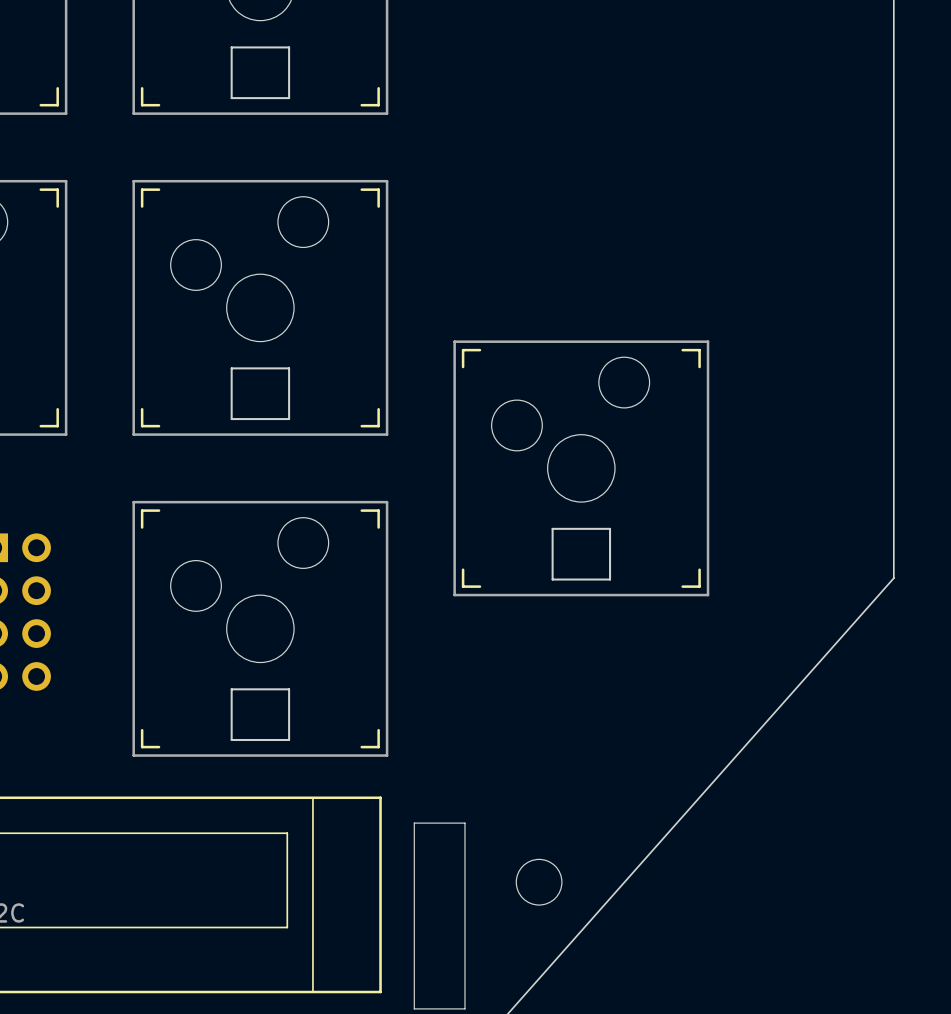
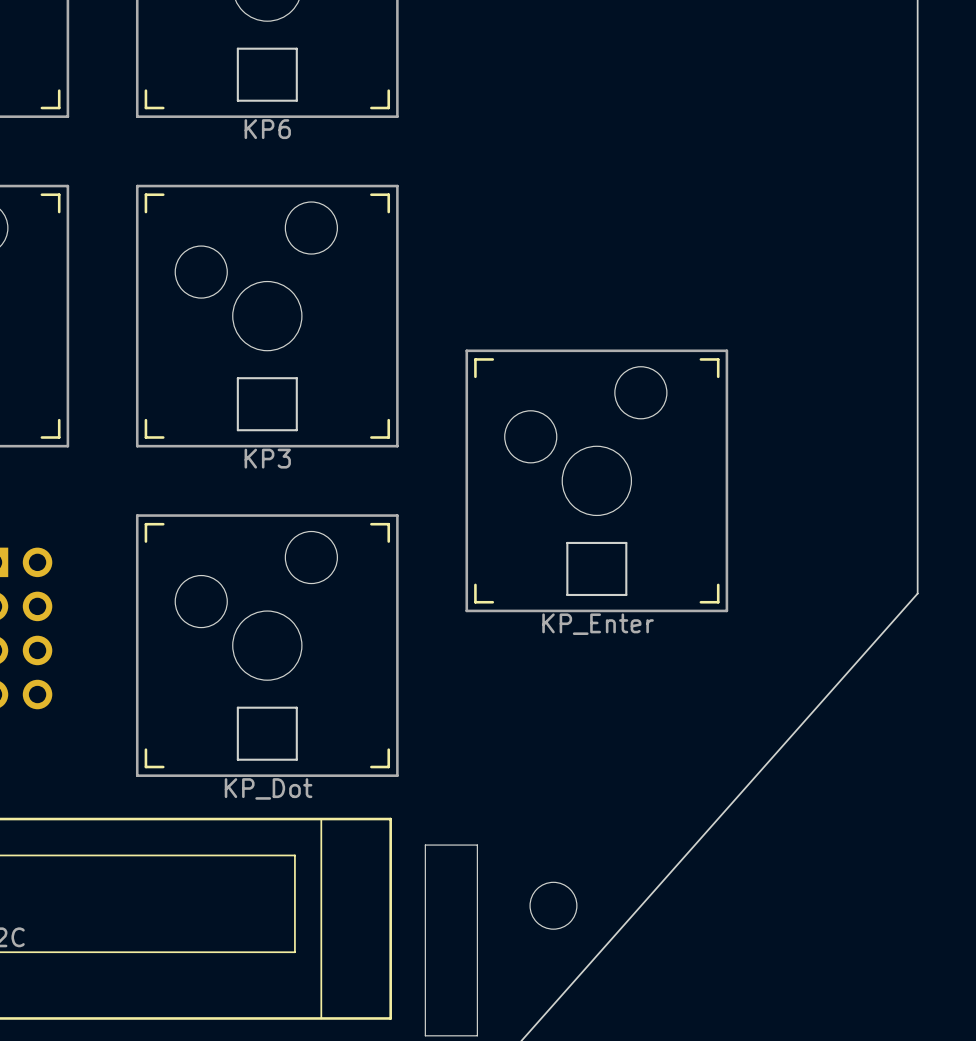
part value: none -> KP6 (267, 129)
part value: none -> KP3 (267, 458)
part value: none -> KP_Enter (598, 624)
part value: none -> KP_Dot (268, 788)

